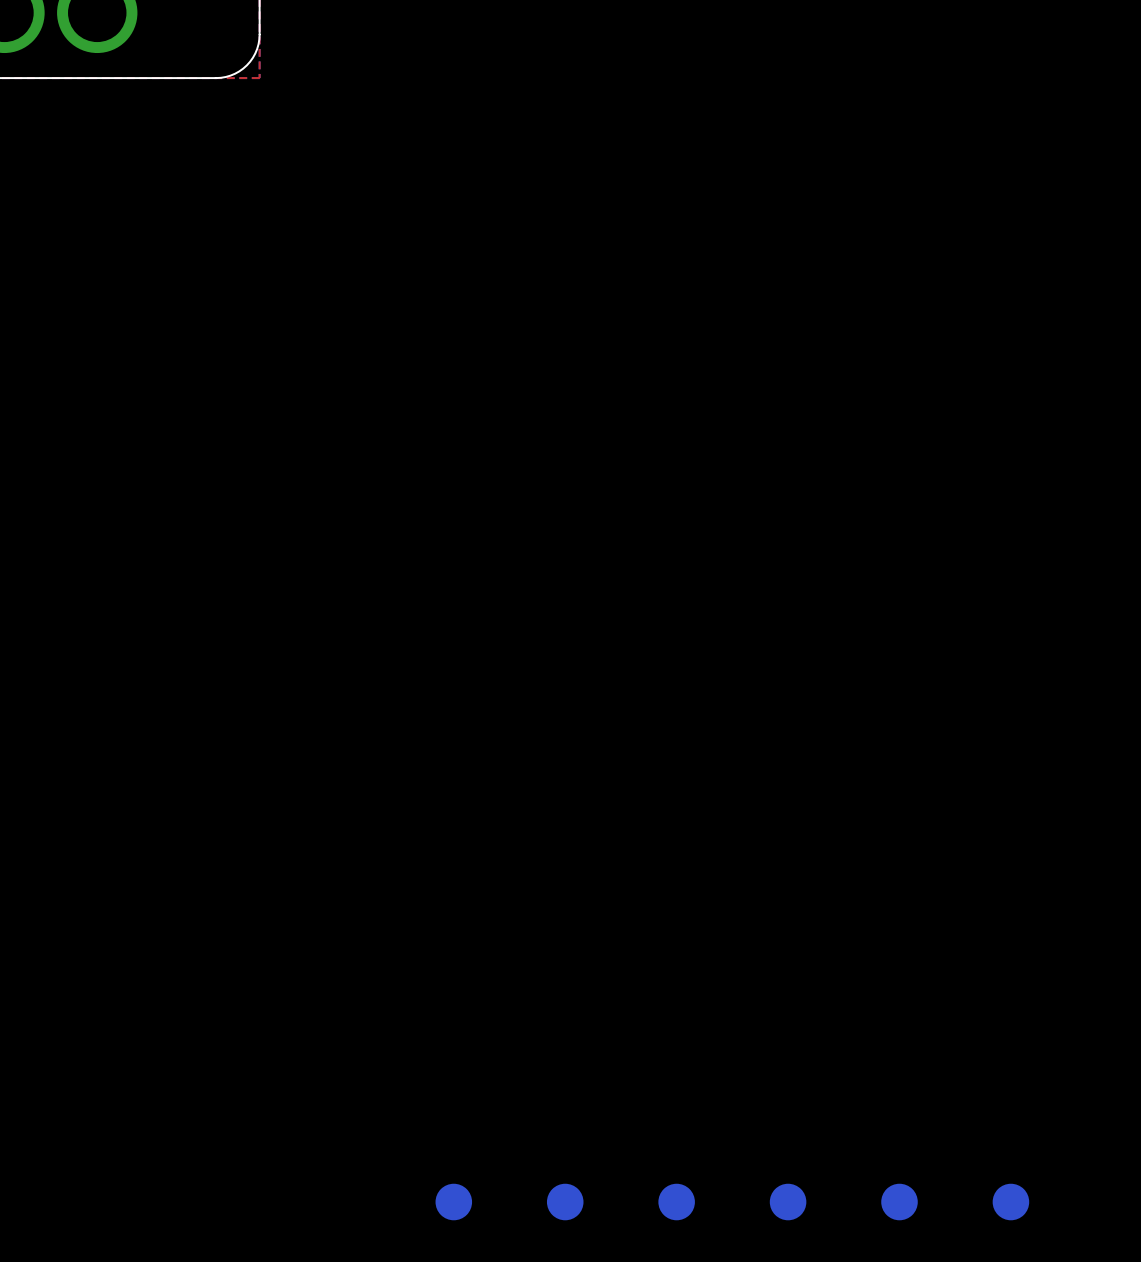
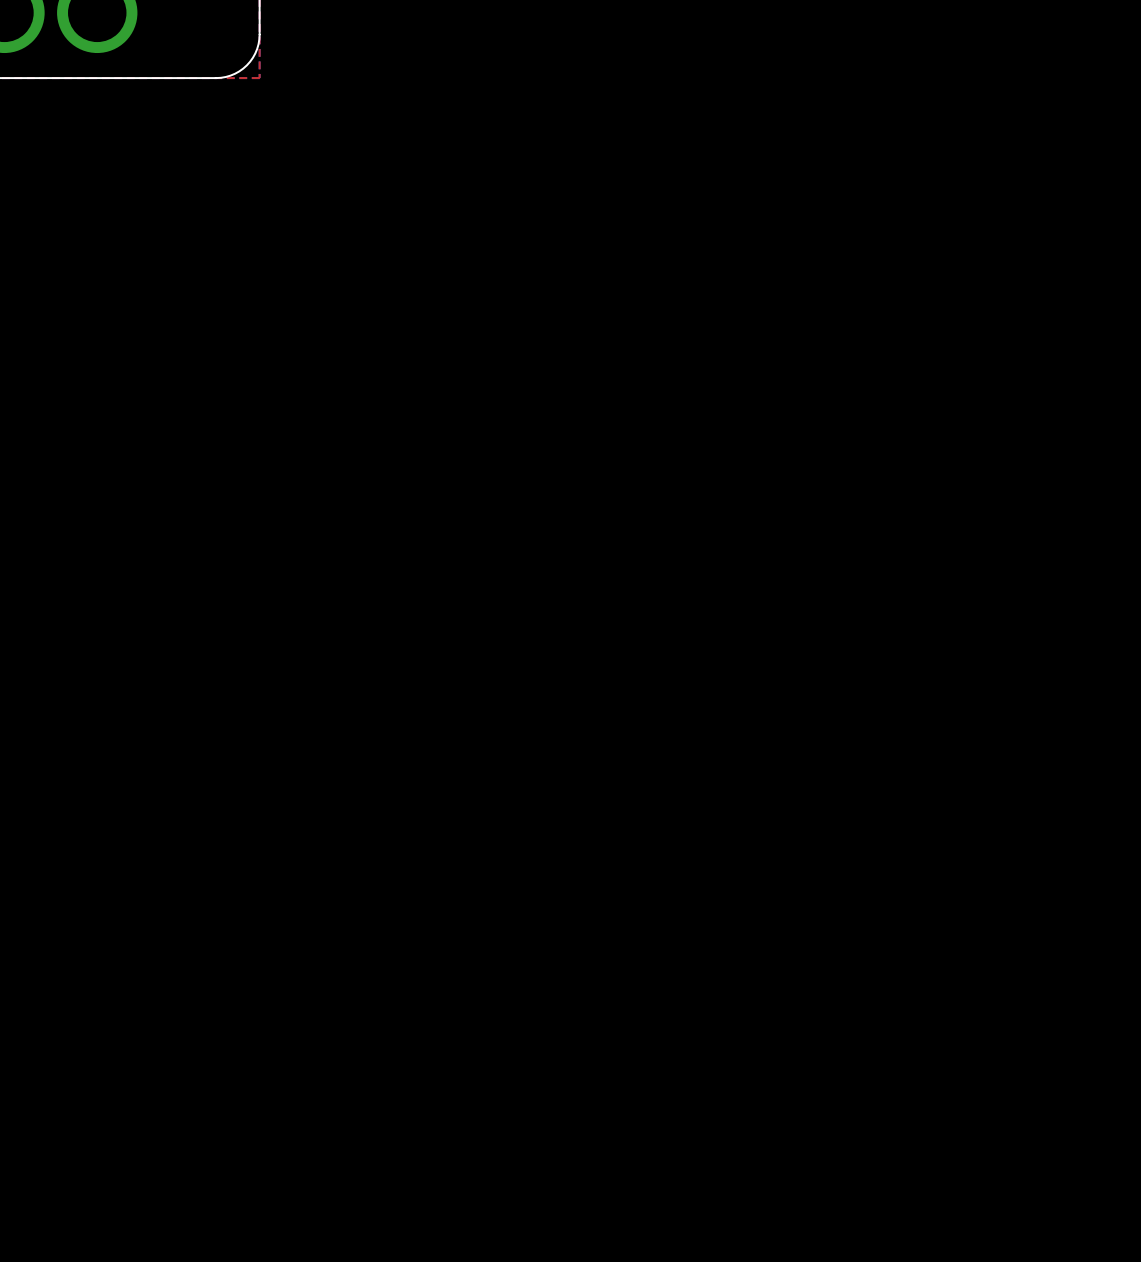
part: (453, 1202) -> none
part: (565, 1202) -> none
part: (676, 1202) -> none
part: (788, 1202) -> none
part: (899, 1202) -> none
part: (1010, 1202) -> none

